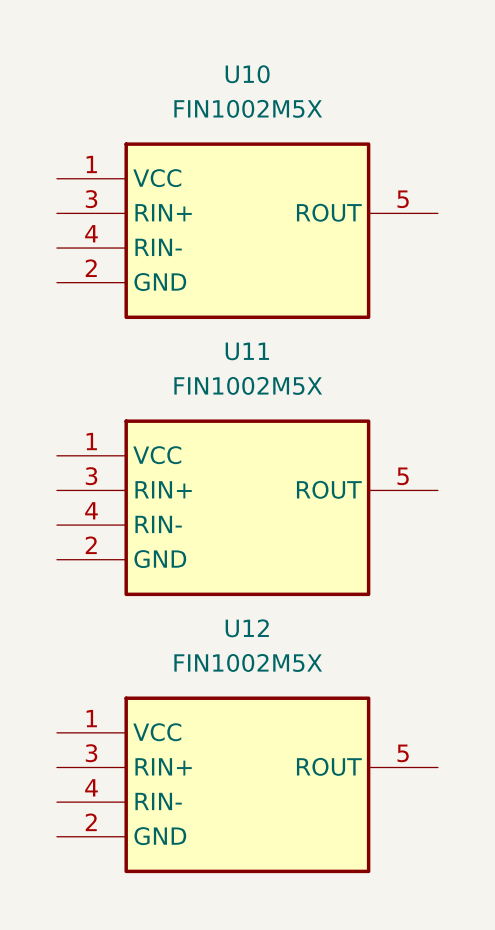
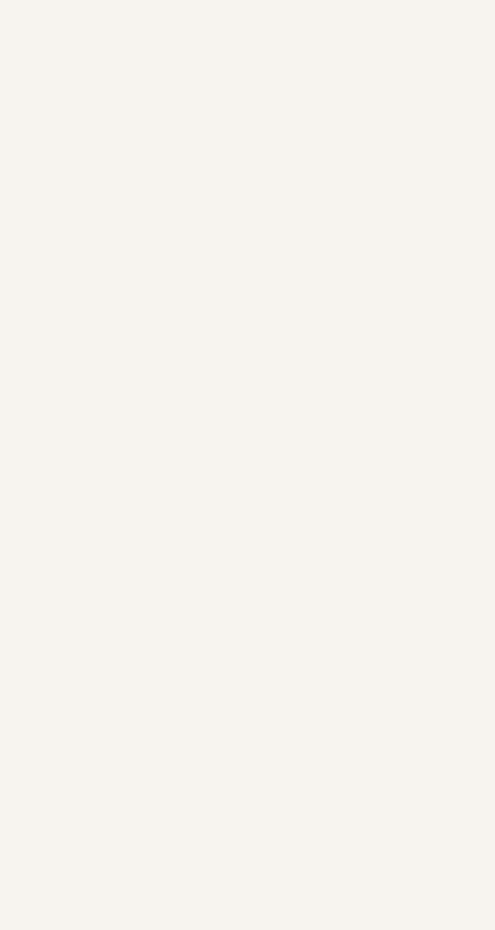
U10: FIN1002M5X (247, 230) -> none
U11: FIN1002M5X (247, 507) -> none
U12: FIN1002M5X (247, 784) -> none

